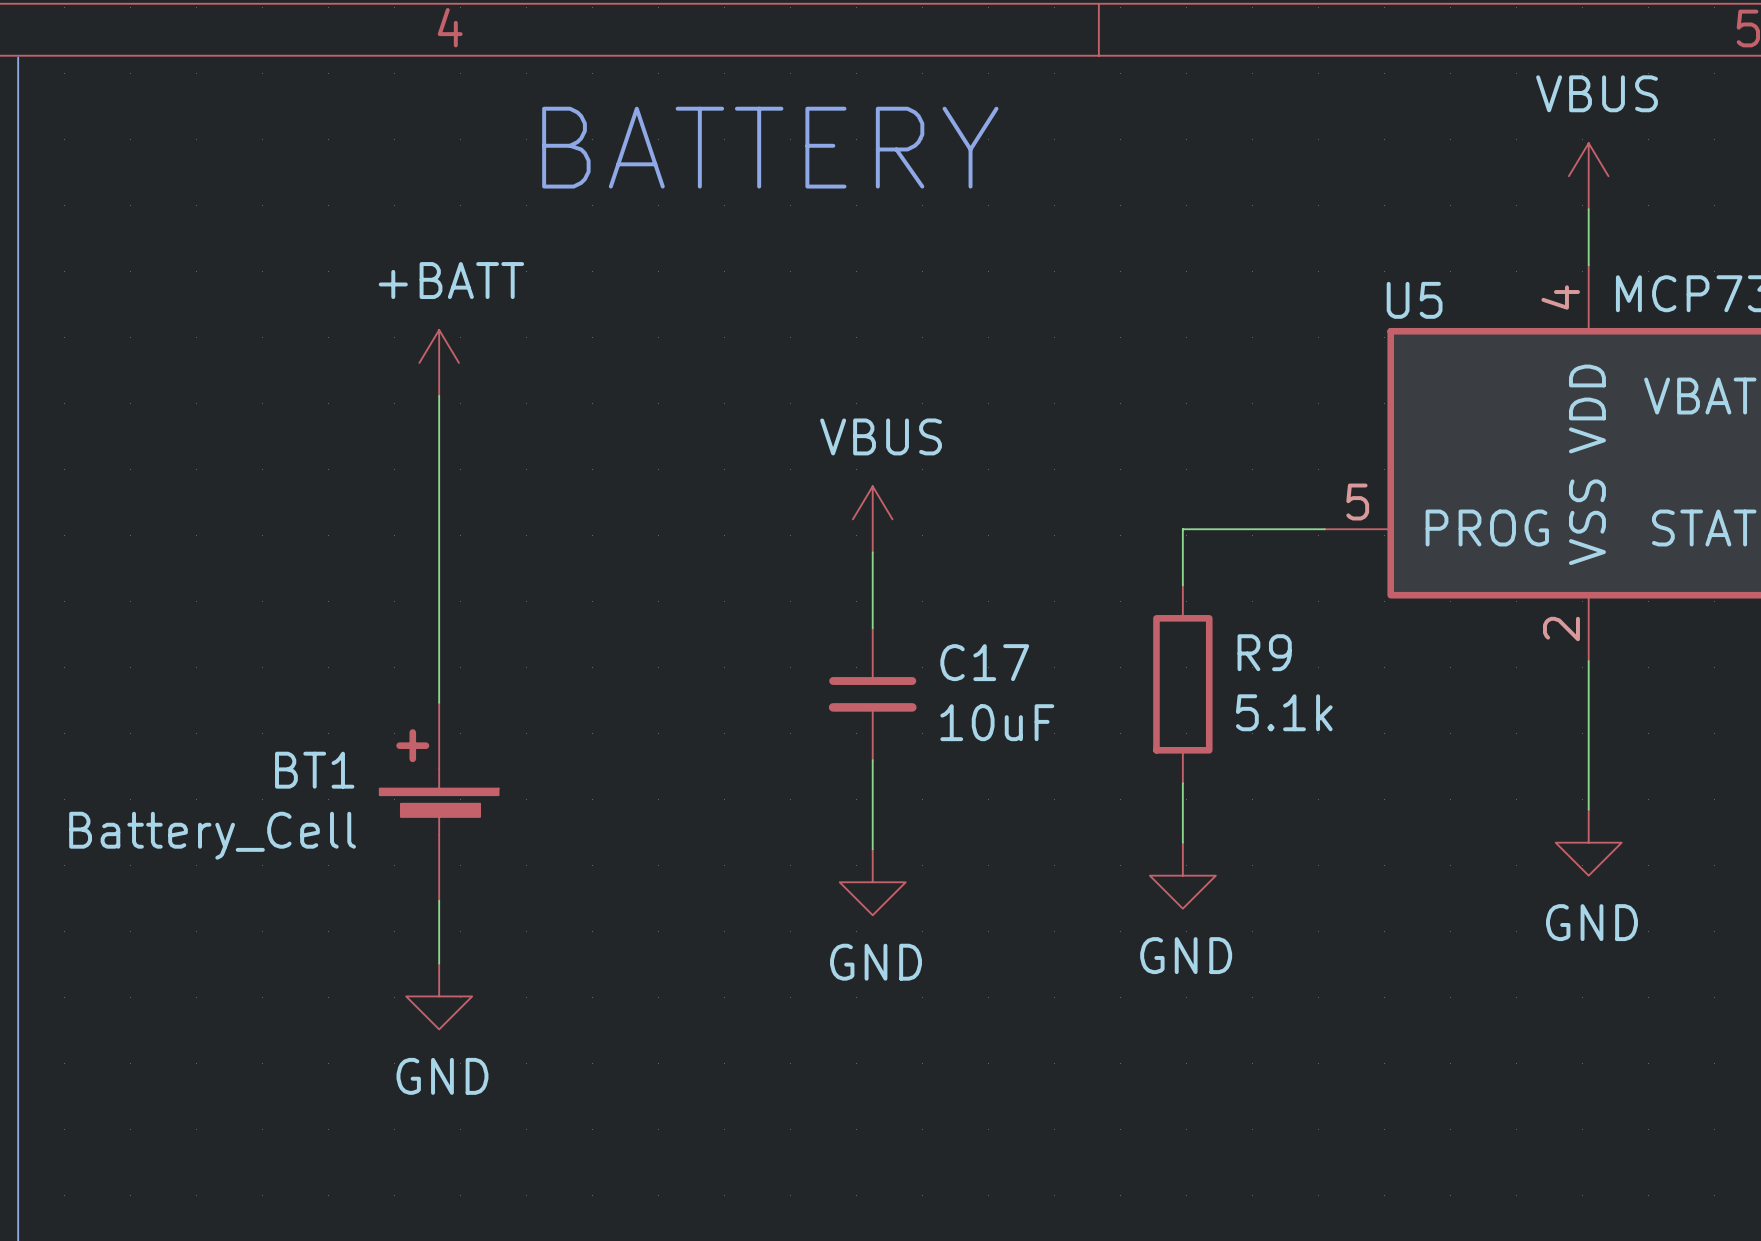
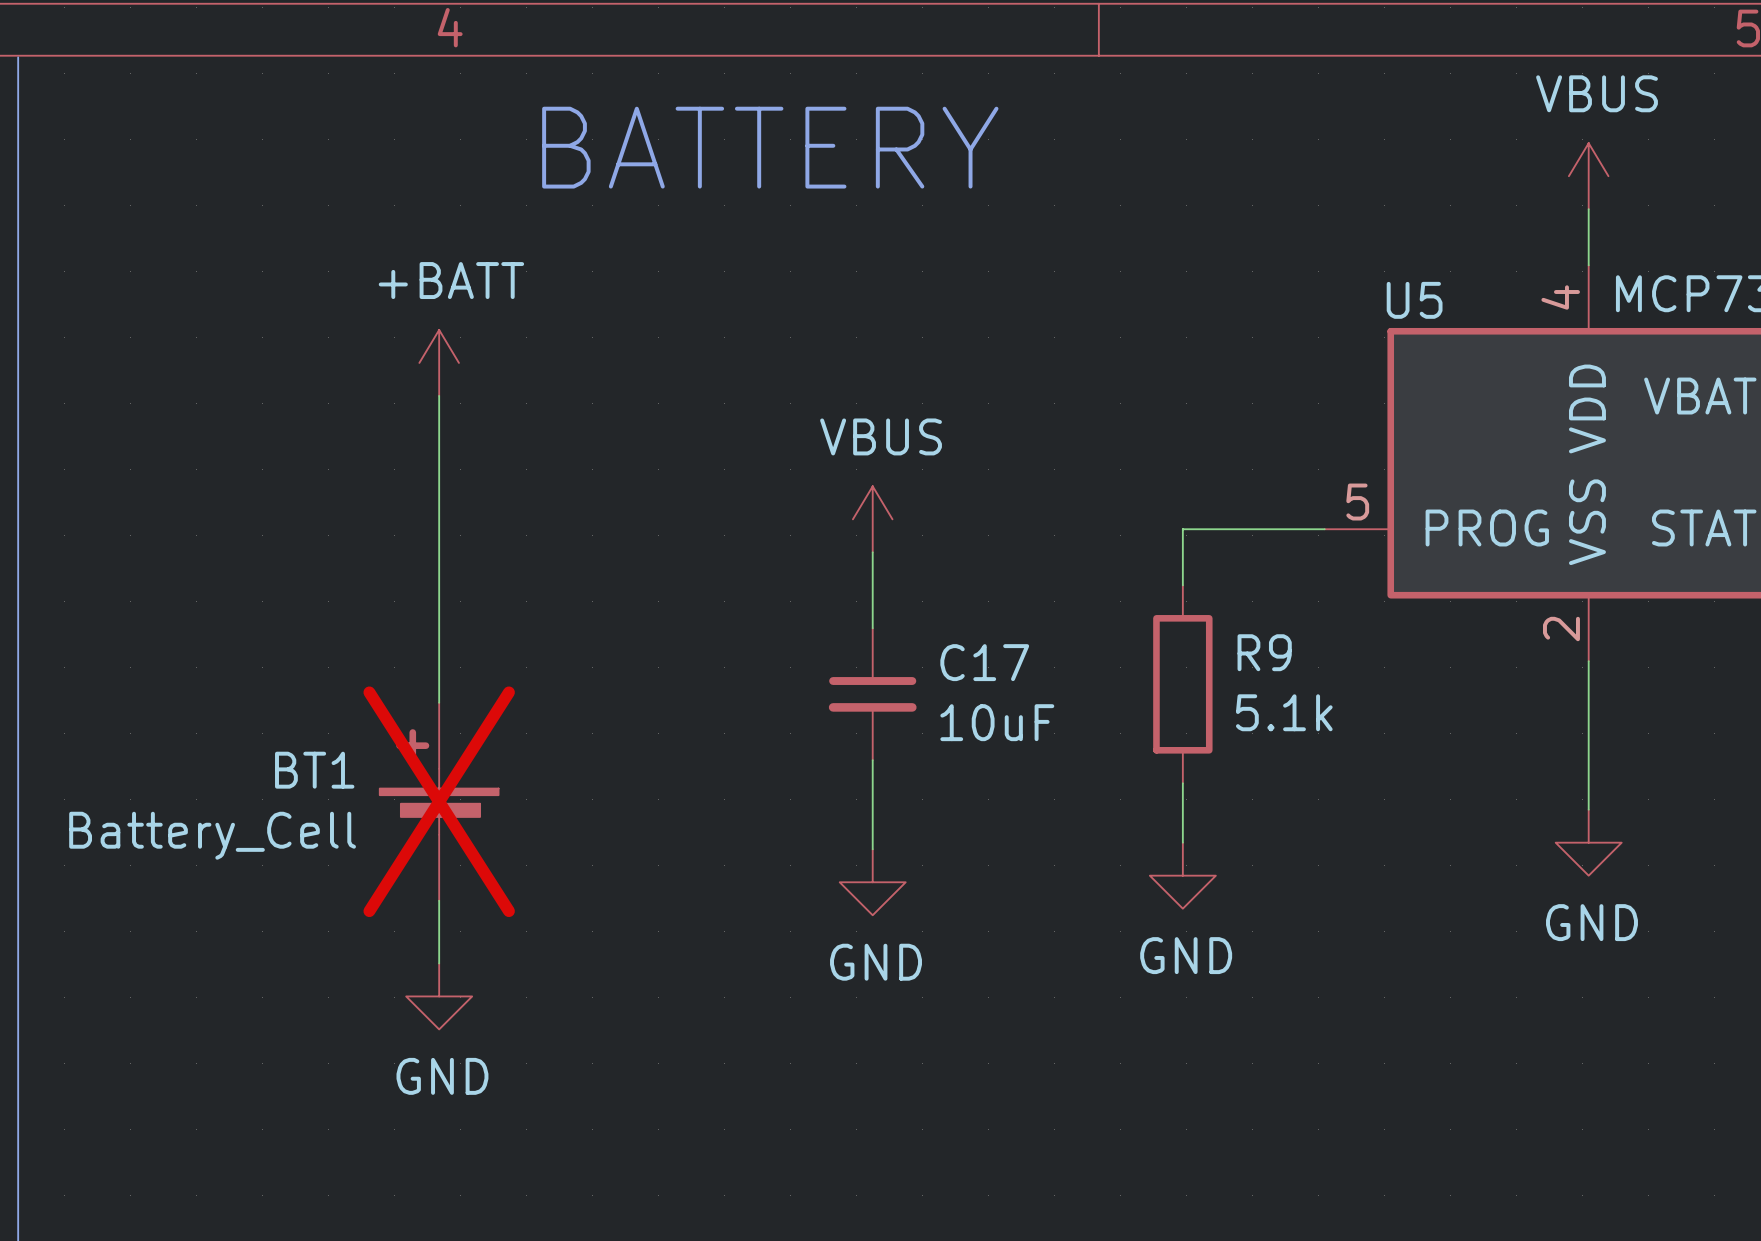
BT1 do-not-place cross: none -> (439, 801)

